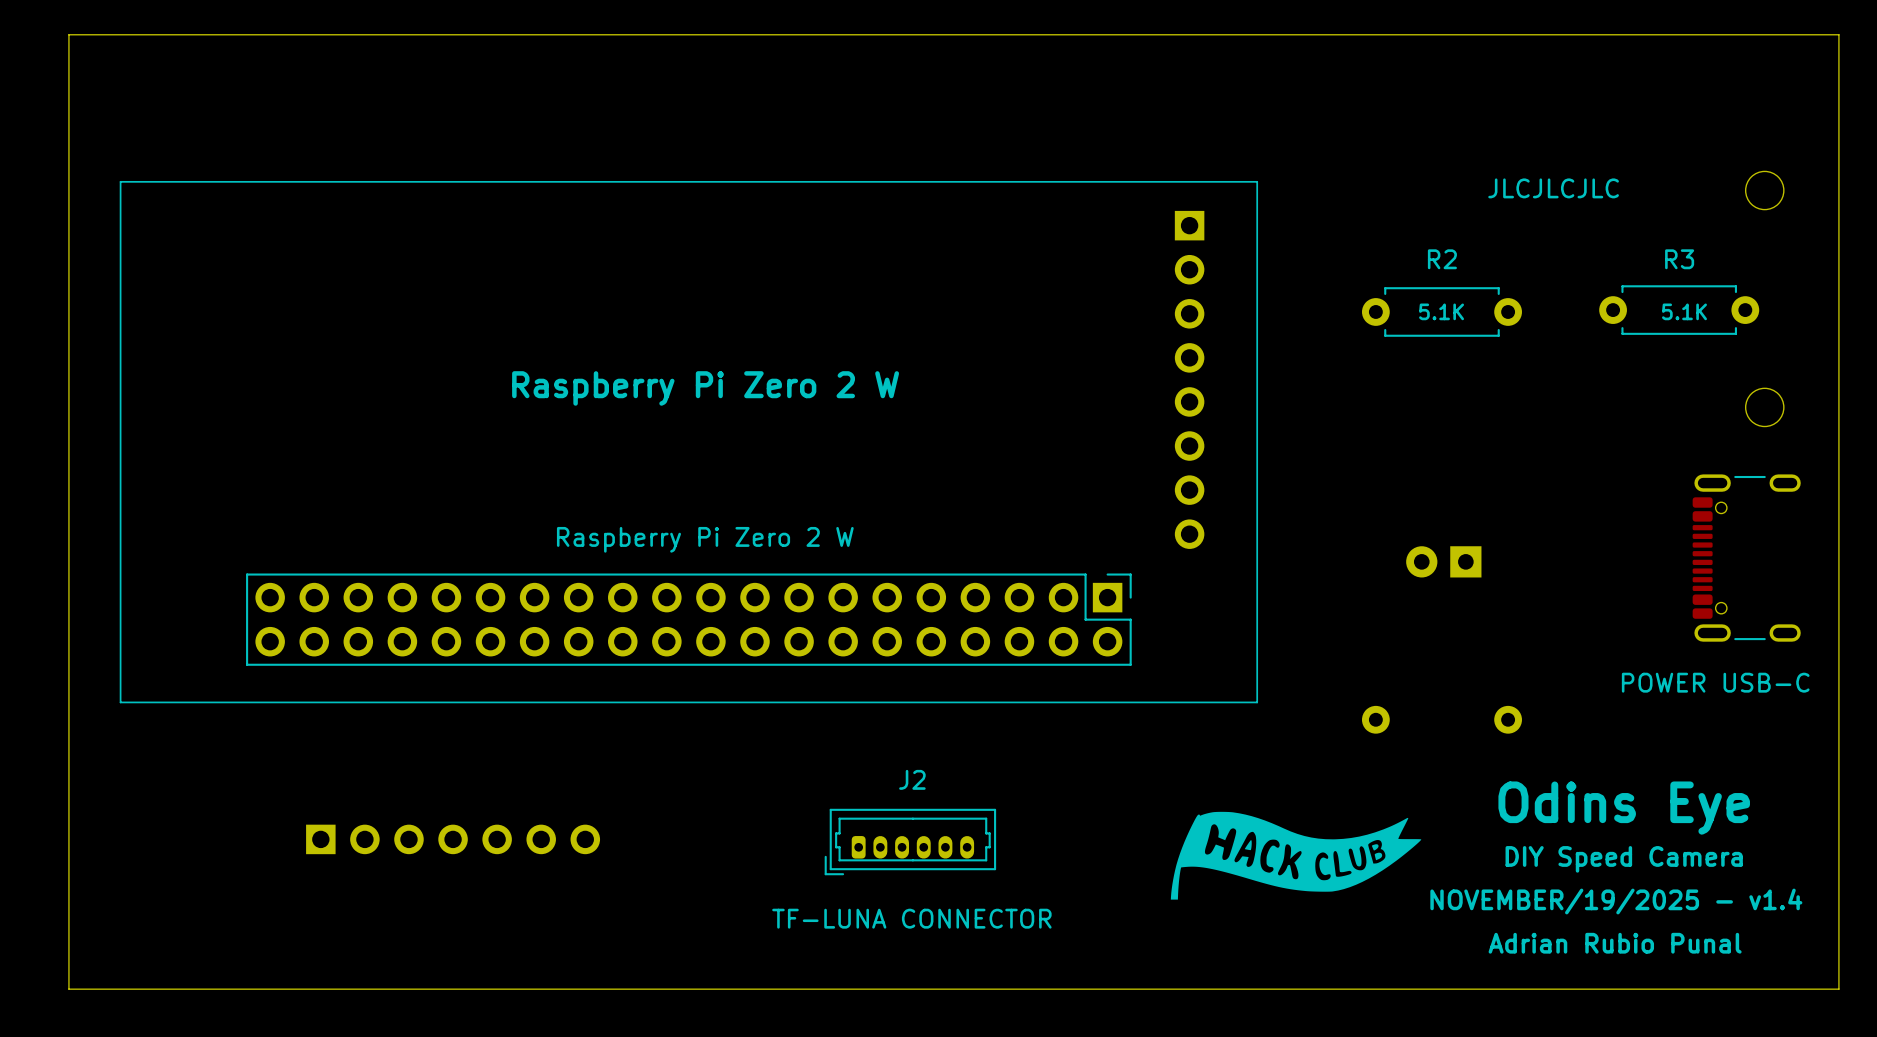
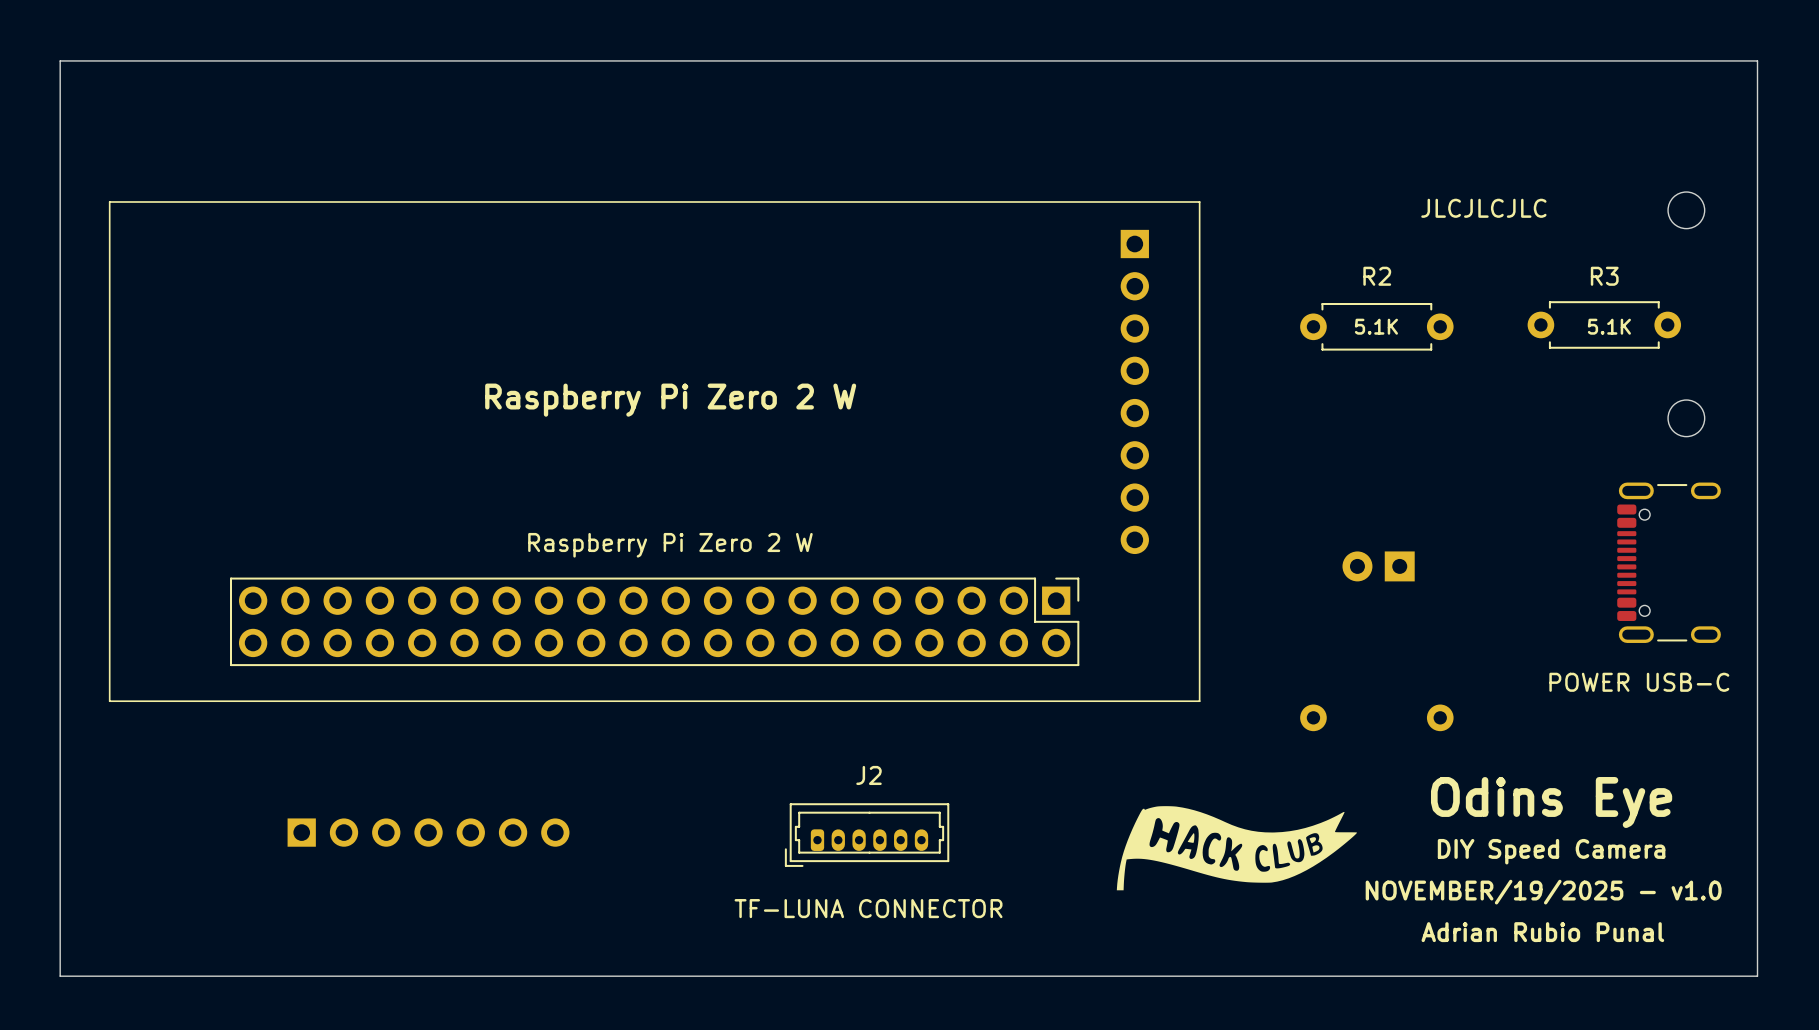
text: NOVEMBER/19/2025 - v1.4 (1616, 901) -> NOVEMBER/19/2025 - v1.0 (1543, 892)

